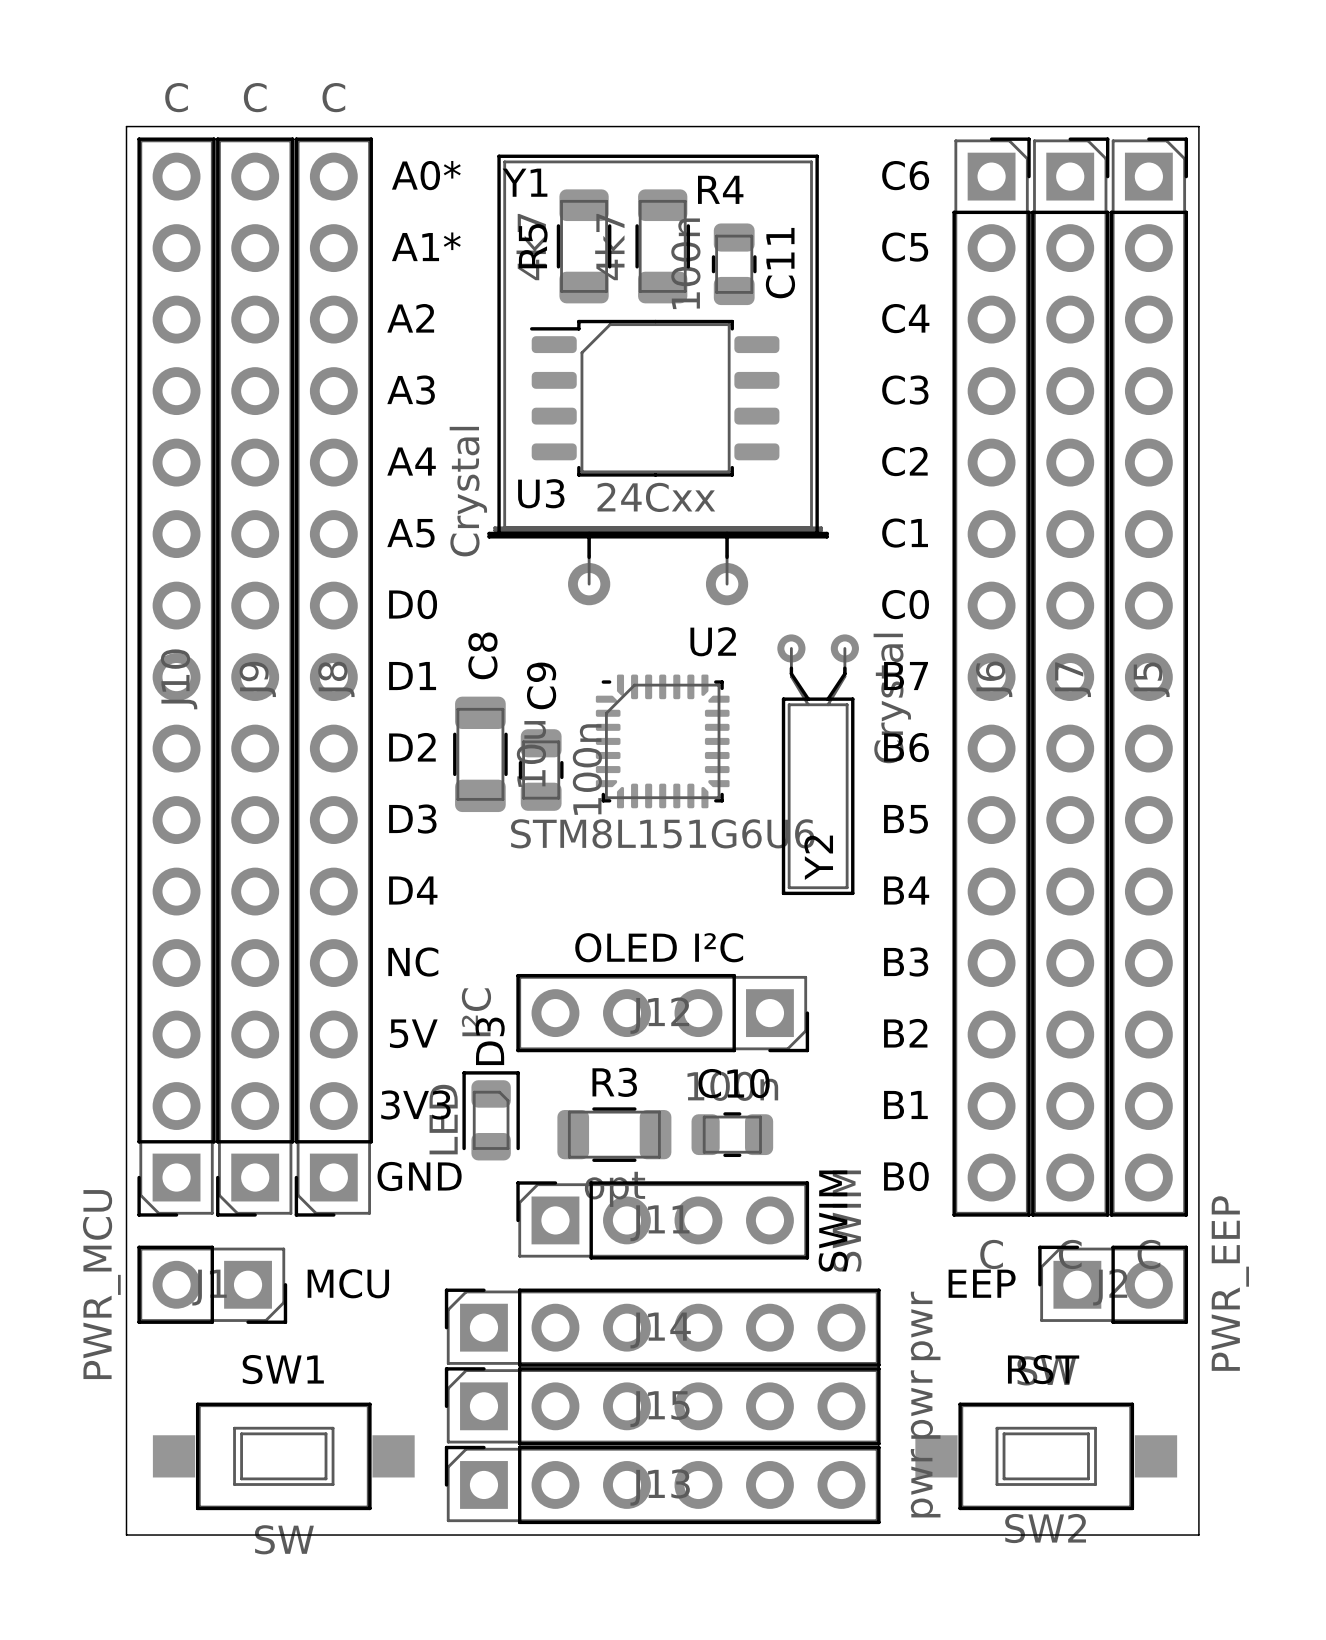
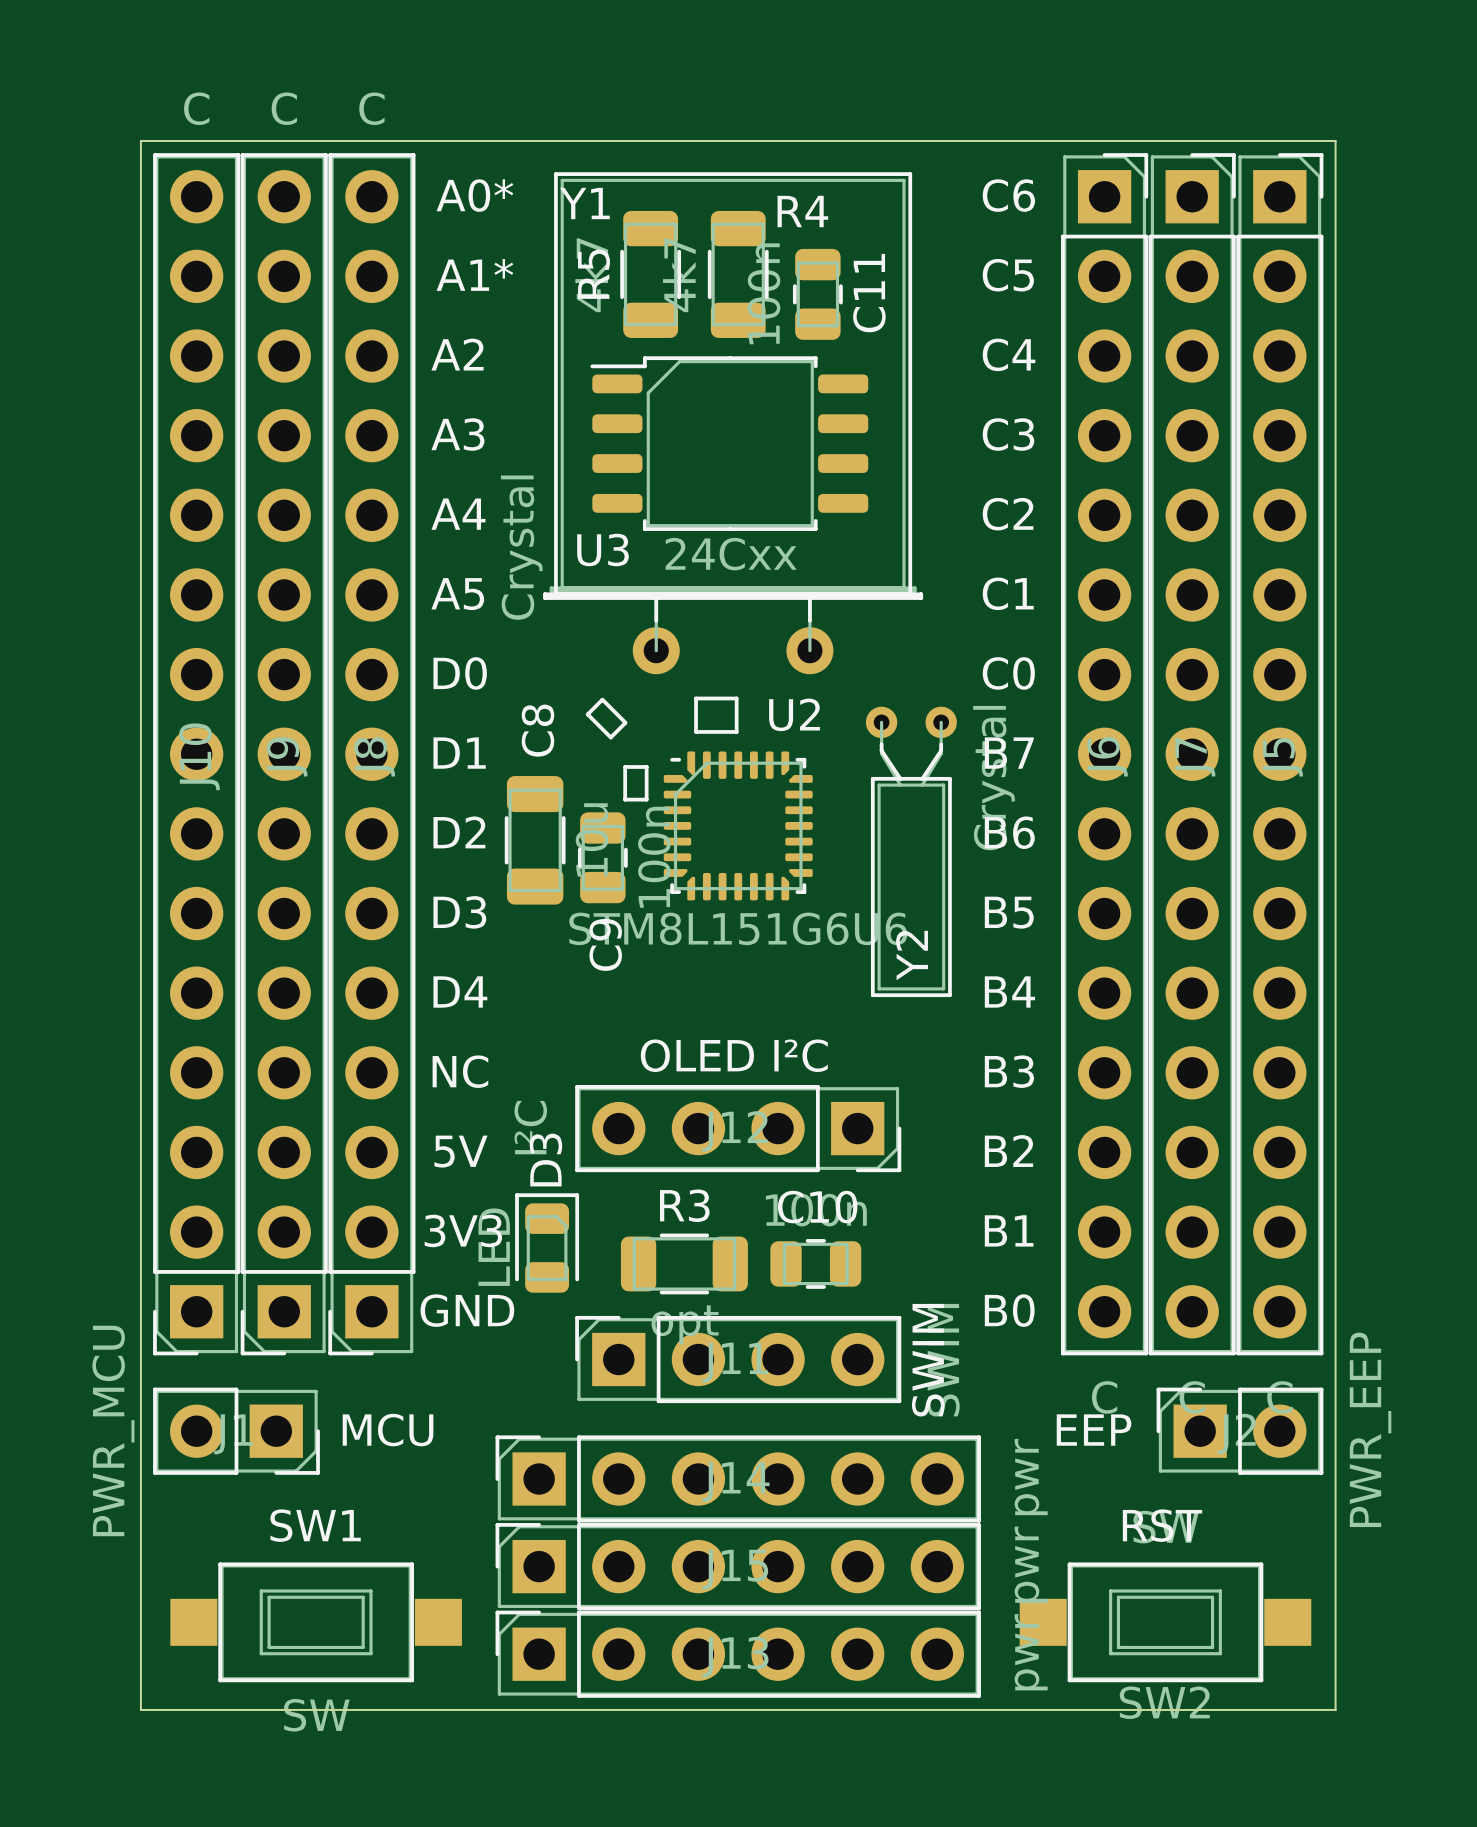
line: none -> (696, 698) (736, 698) (736, 731) (696, 731) (696, 698)
line: none -> (602, 699) (625, 722)
line: none -> (602, 700) (587, 714) (610, 737) (625, 723)
C9 name position: C9 (541, 685) -> C9 (605, 944)
line: none -> (625, 766) (646, 766) (646, 799) (625, 799) (625, 766)

